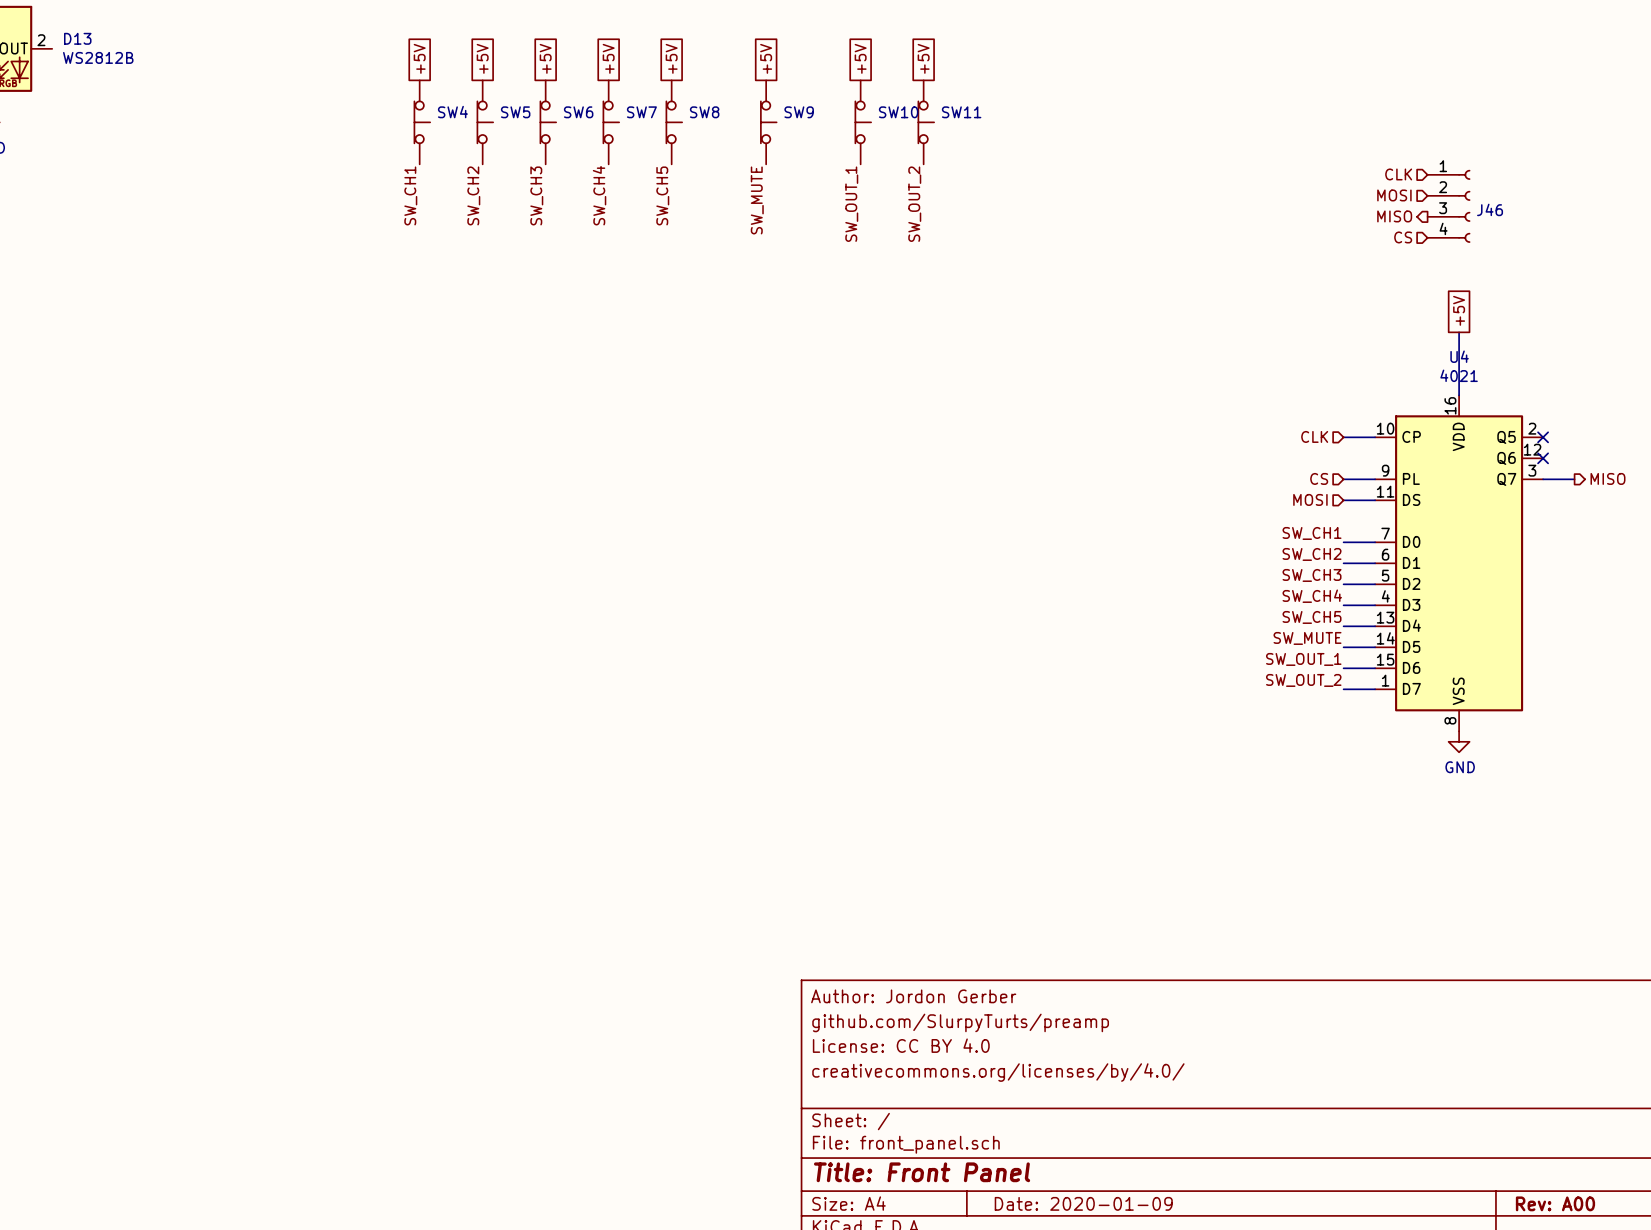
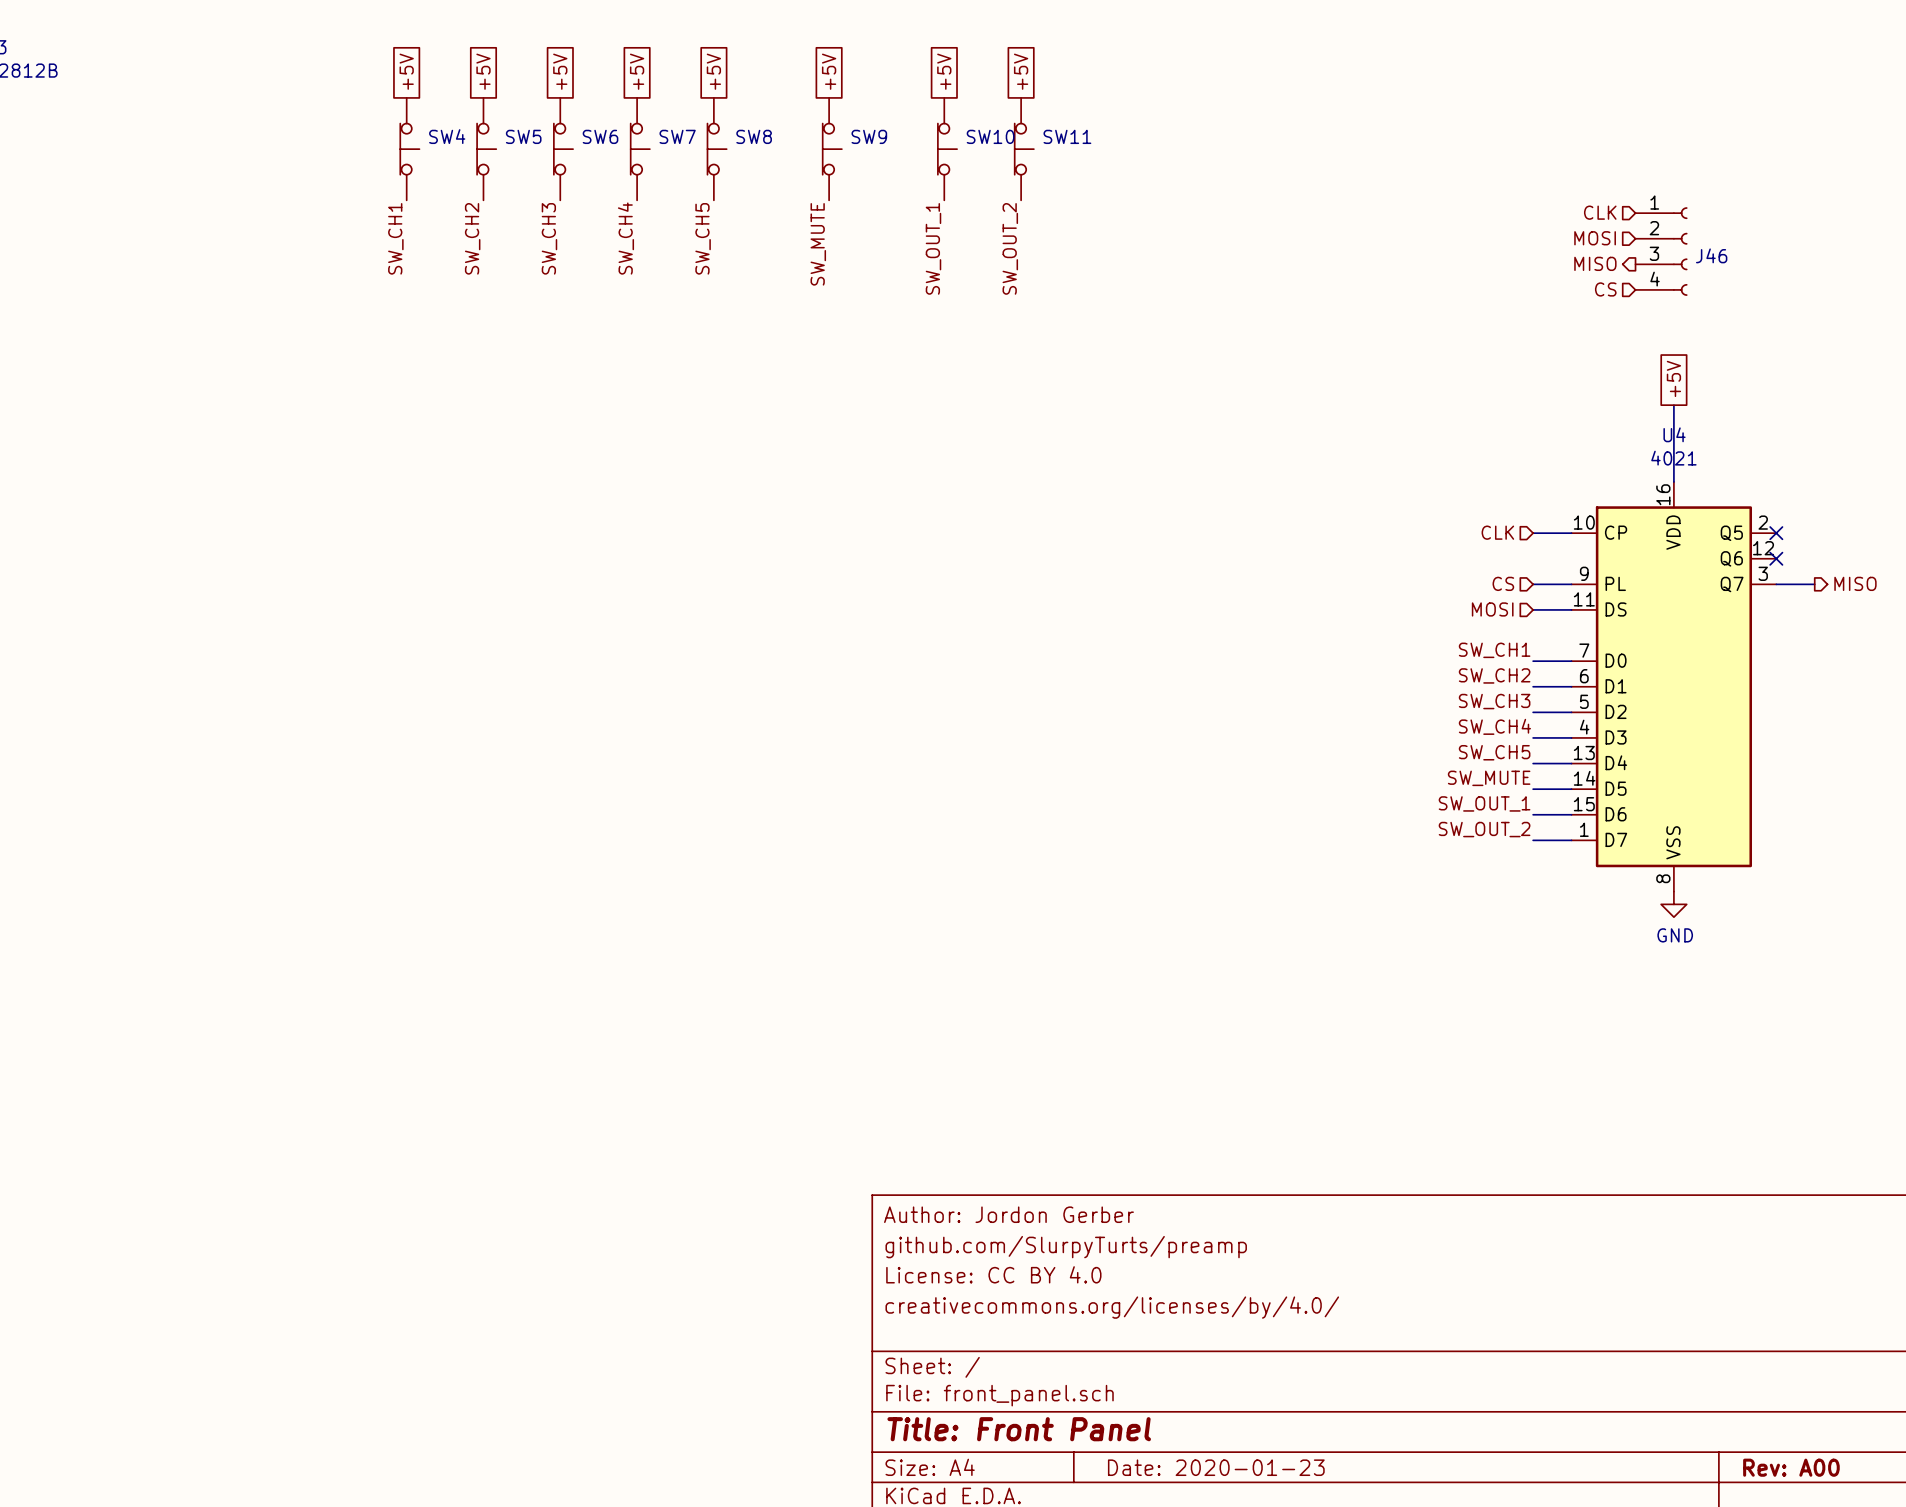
title block: Date: 2020-01-09 (1083, 1203) -> Date: 2020-01-23 (1216, 1467)

